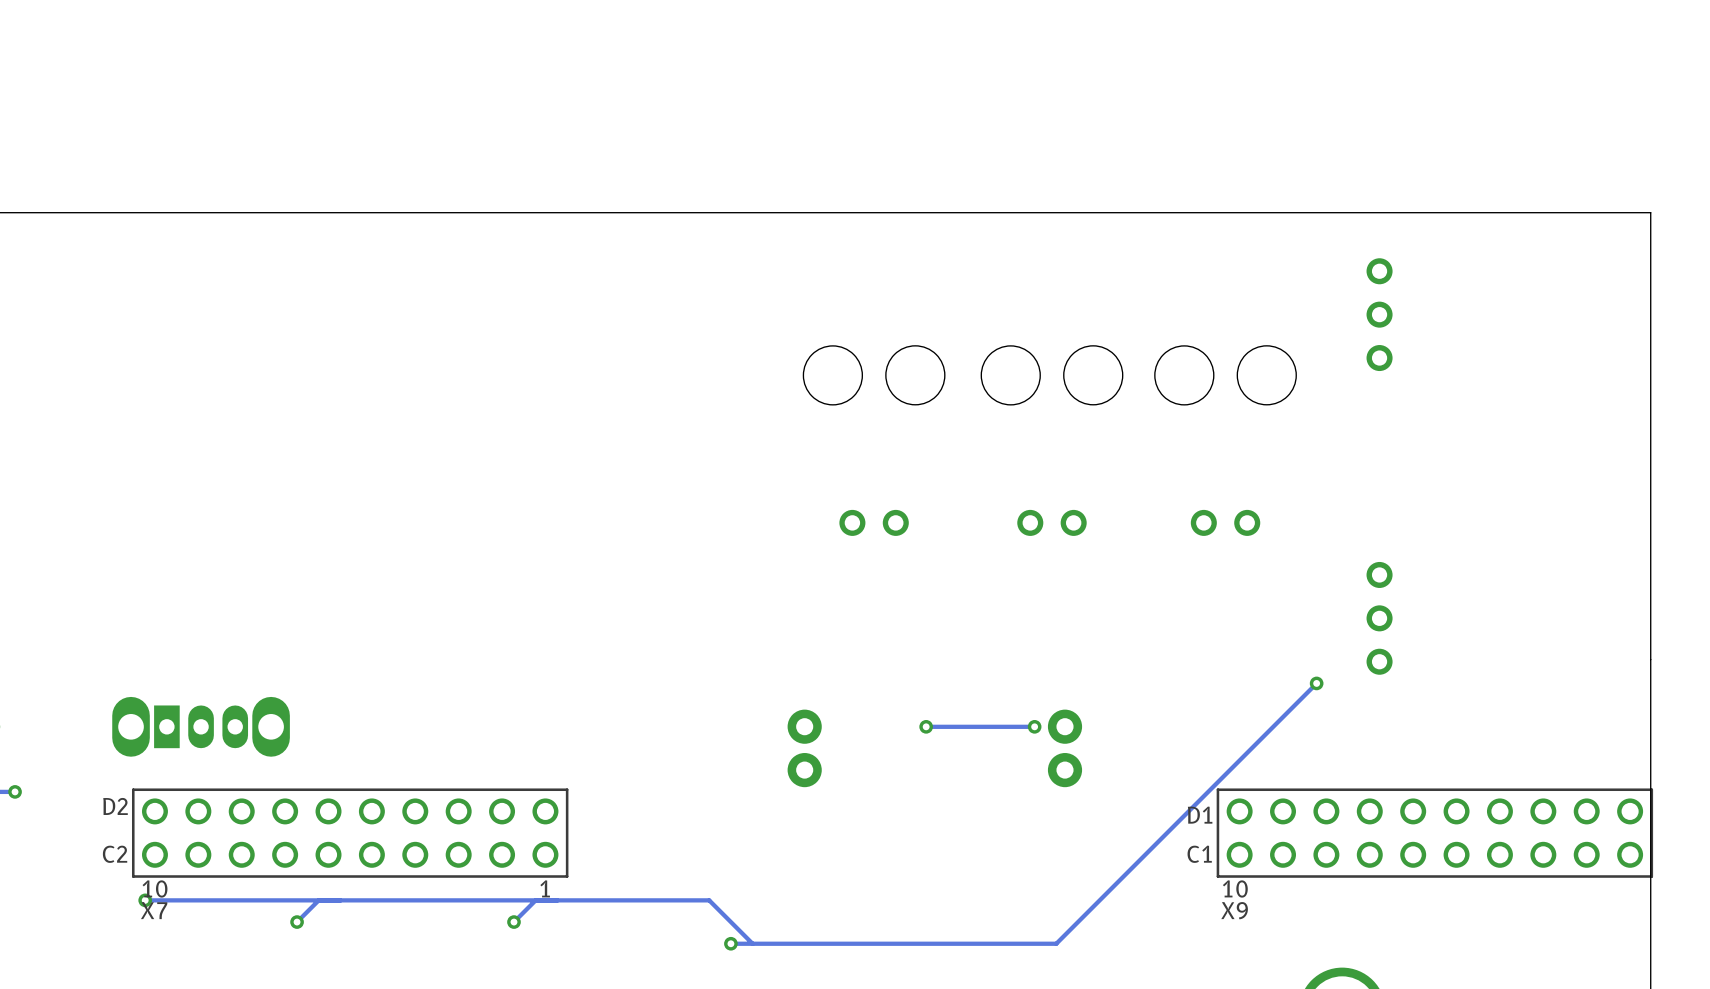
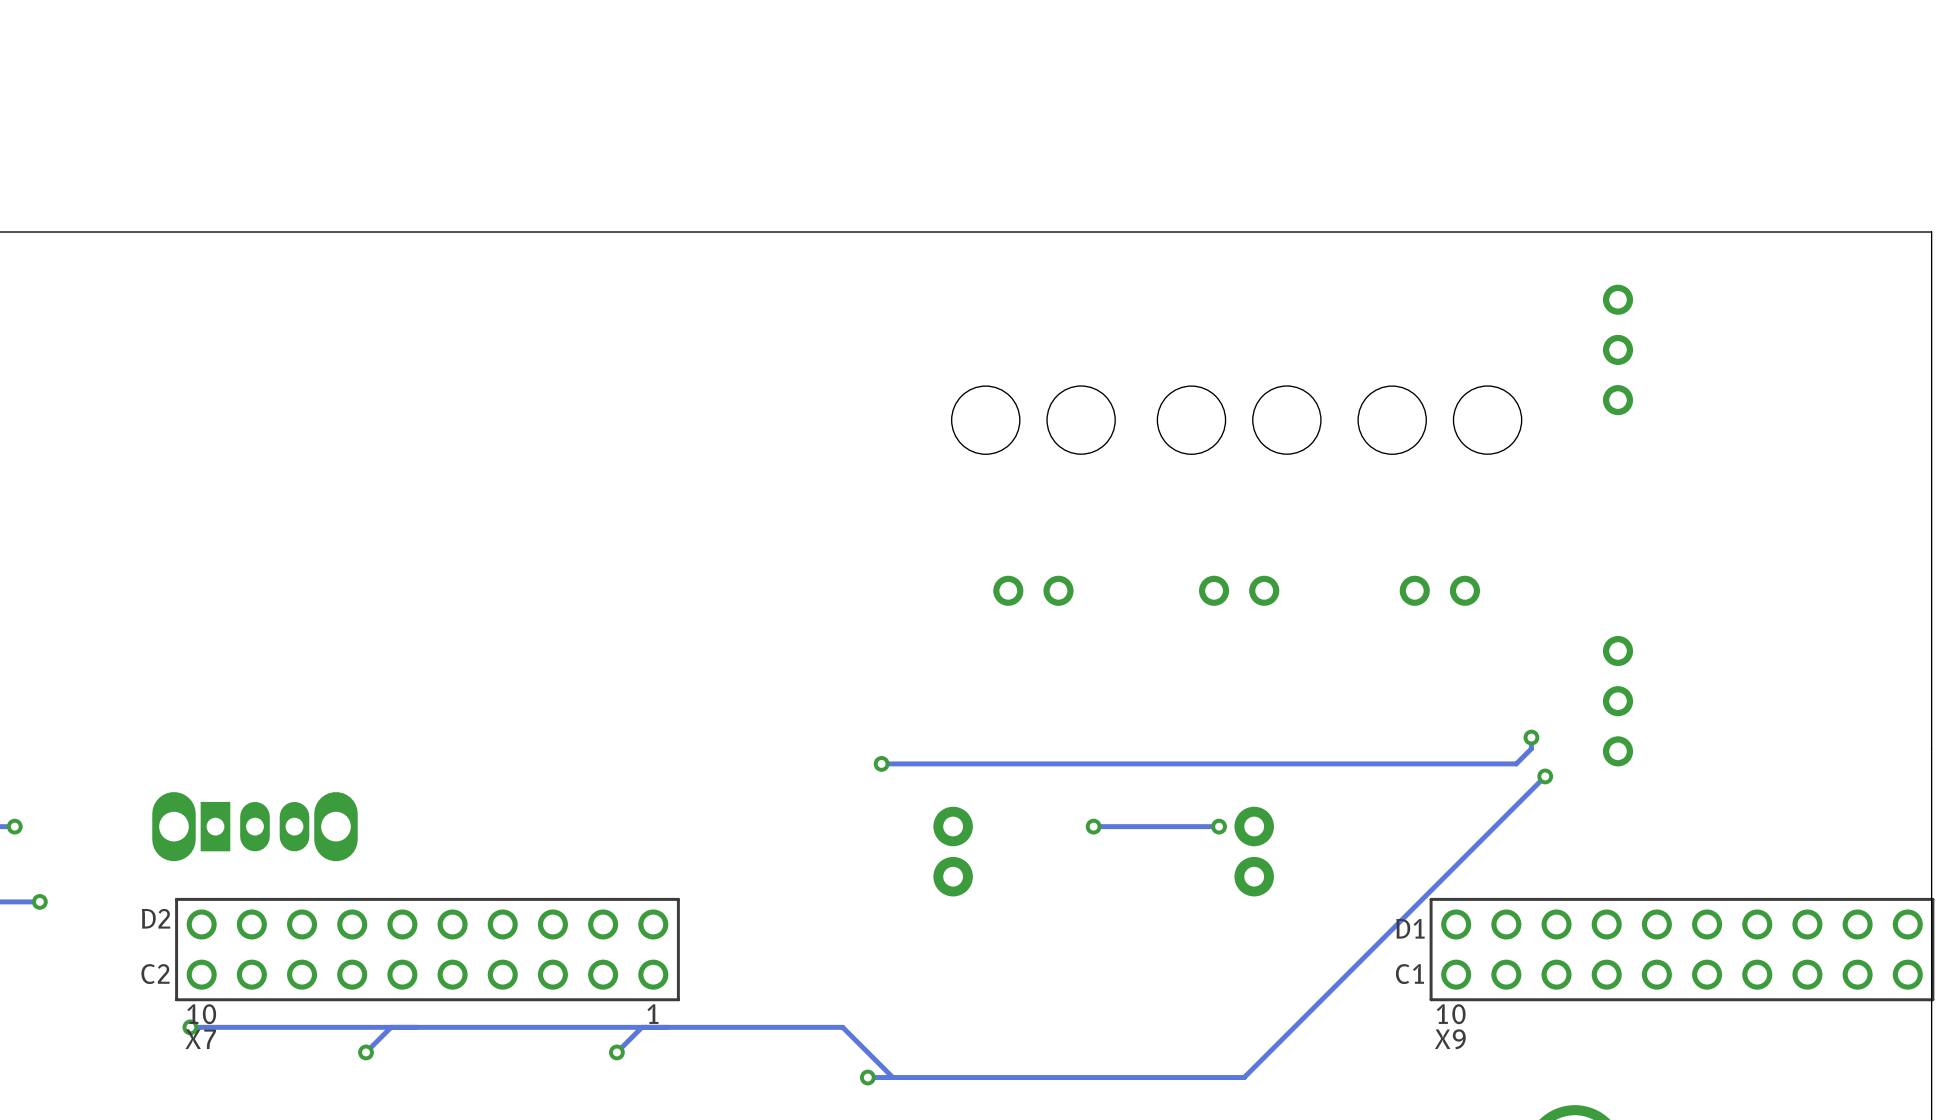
track: none -> (1531, 737) (1531, 748) (1516, 763) (881, 763)
via: none -> (1531, 737)
via: none -> (881, 763)

